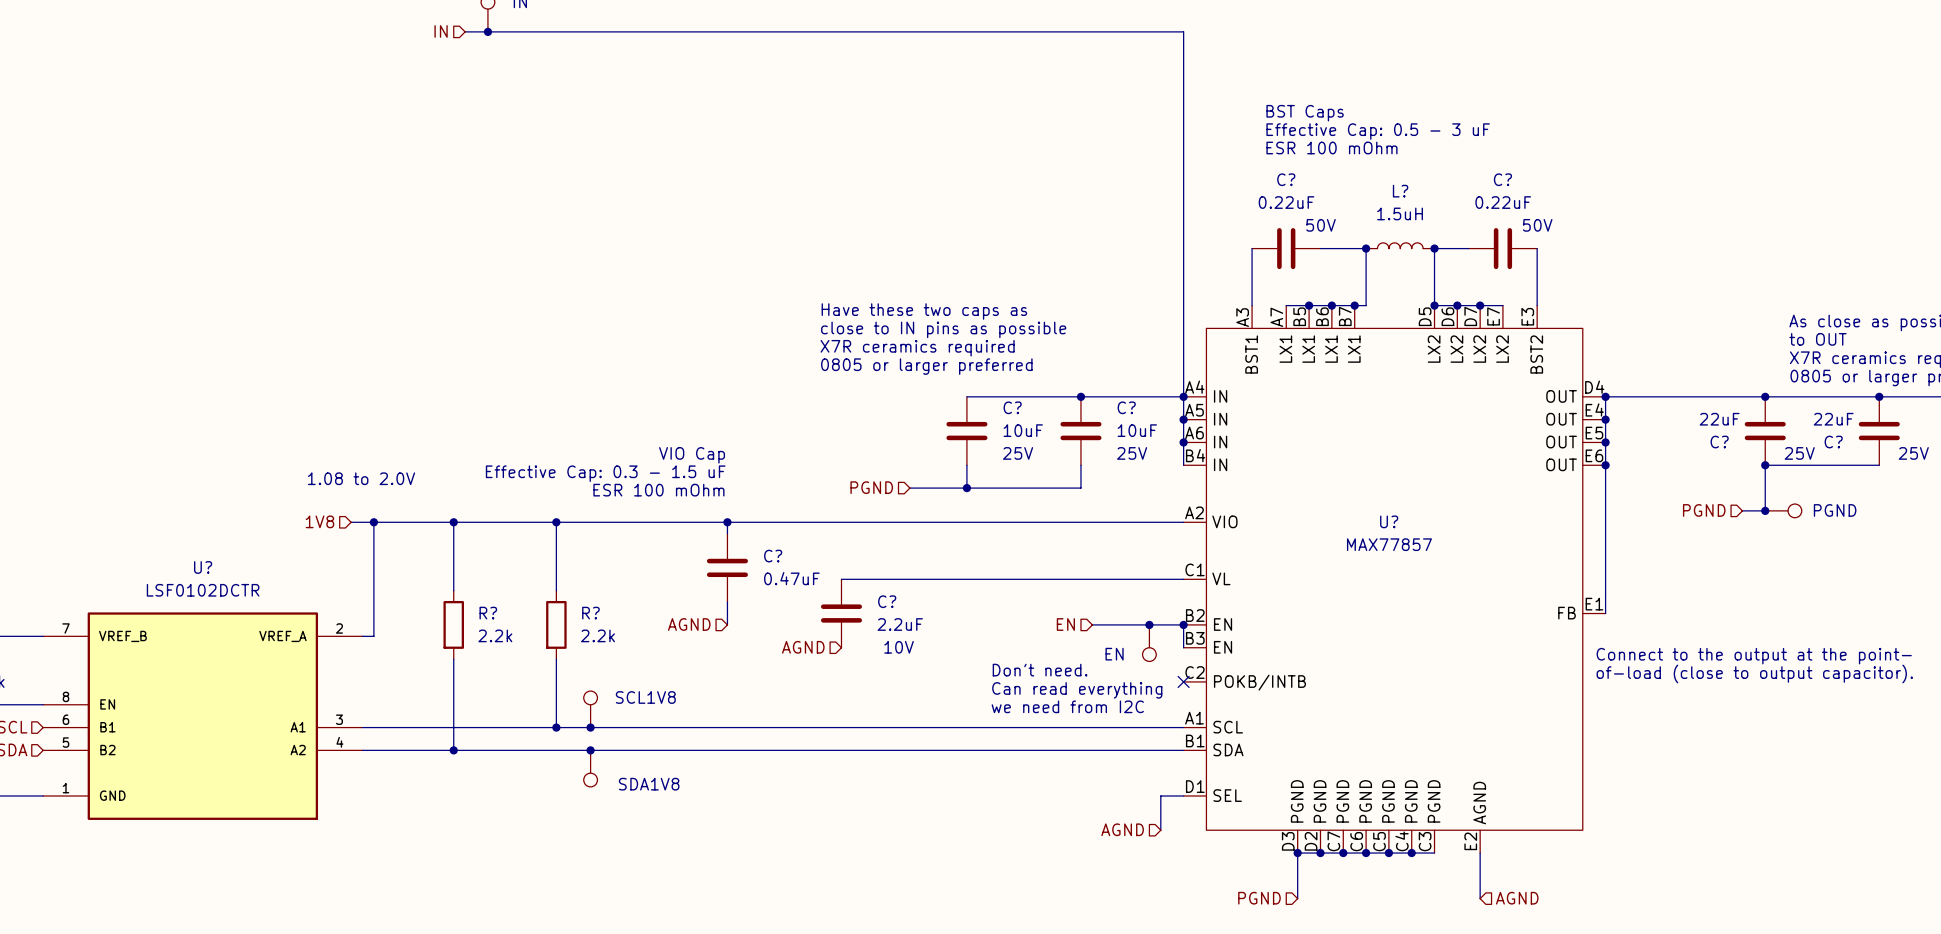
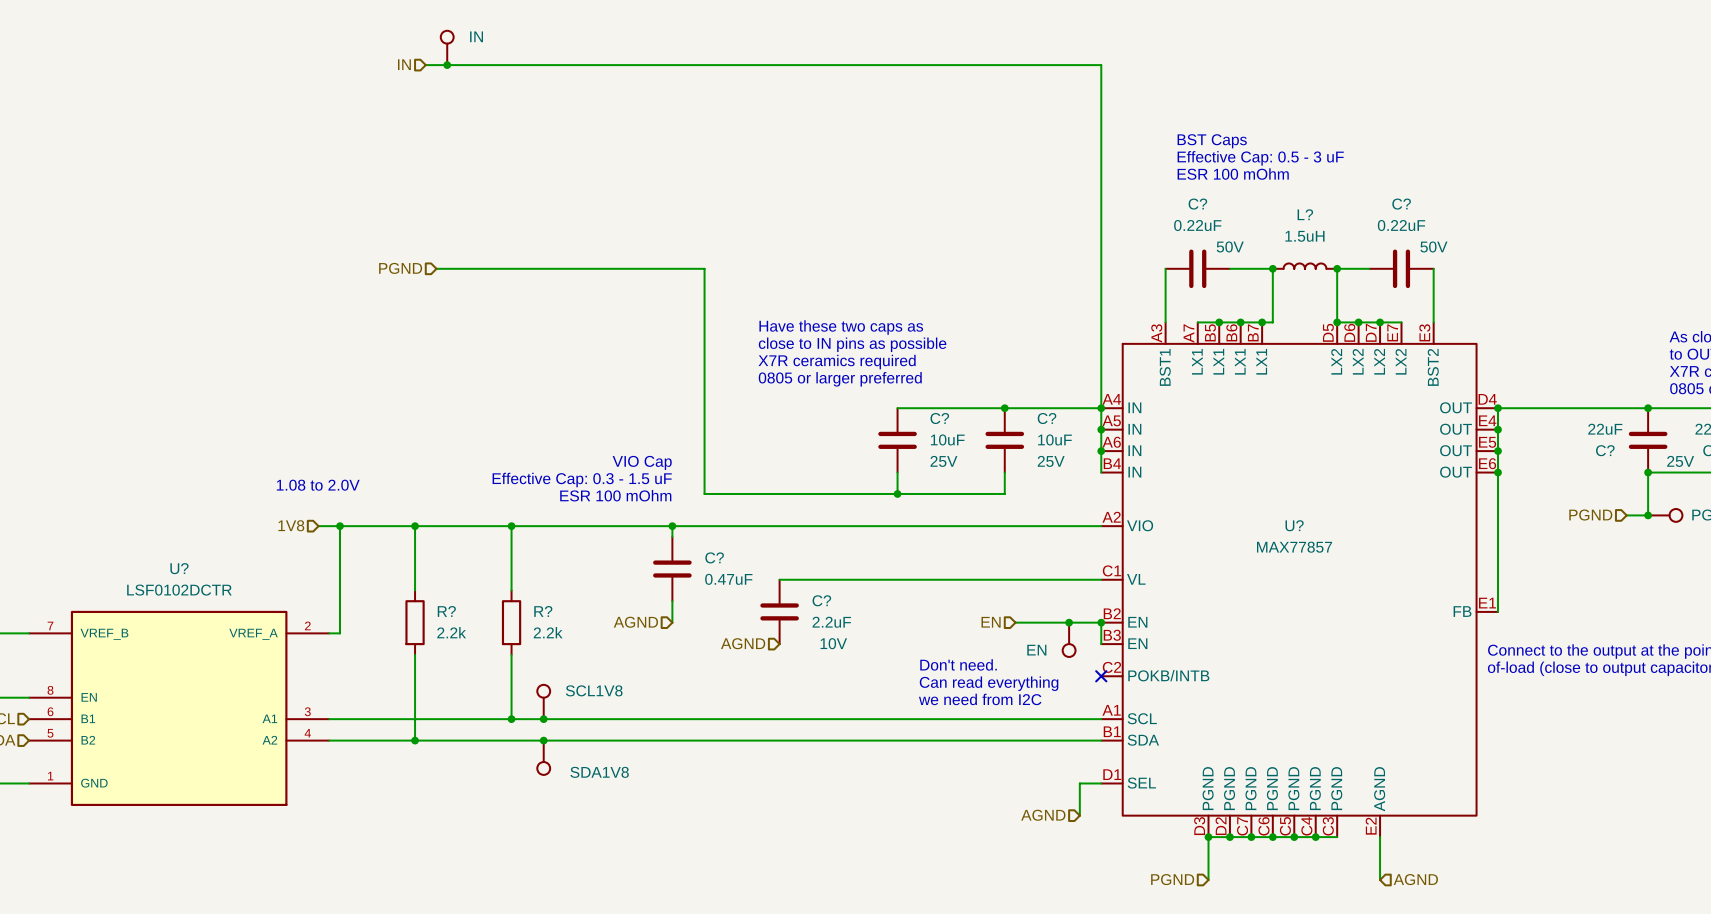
hierarchical label: none -> PGND (400, 268)
wire: none -> (436, 268) (704, 268) (704, 493) (843, 493)
hierarchical label: PGND (871, 487) -> none

